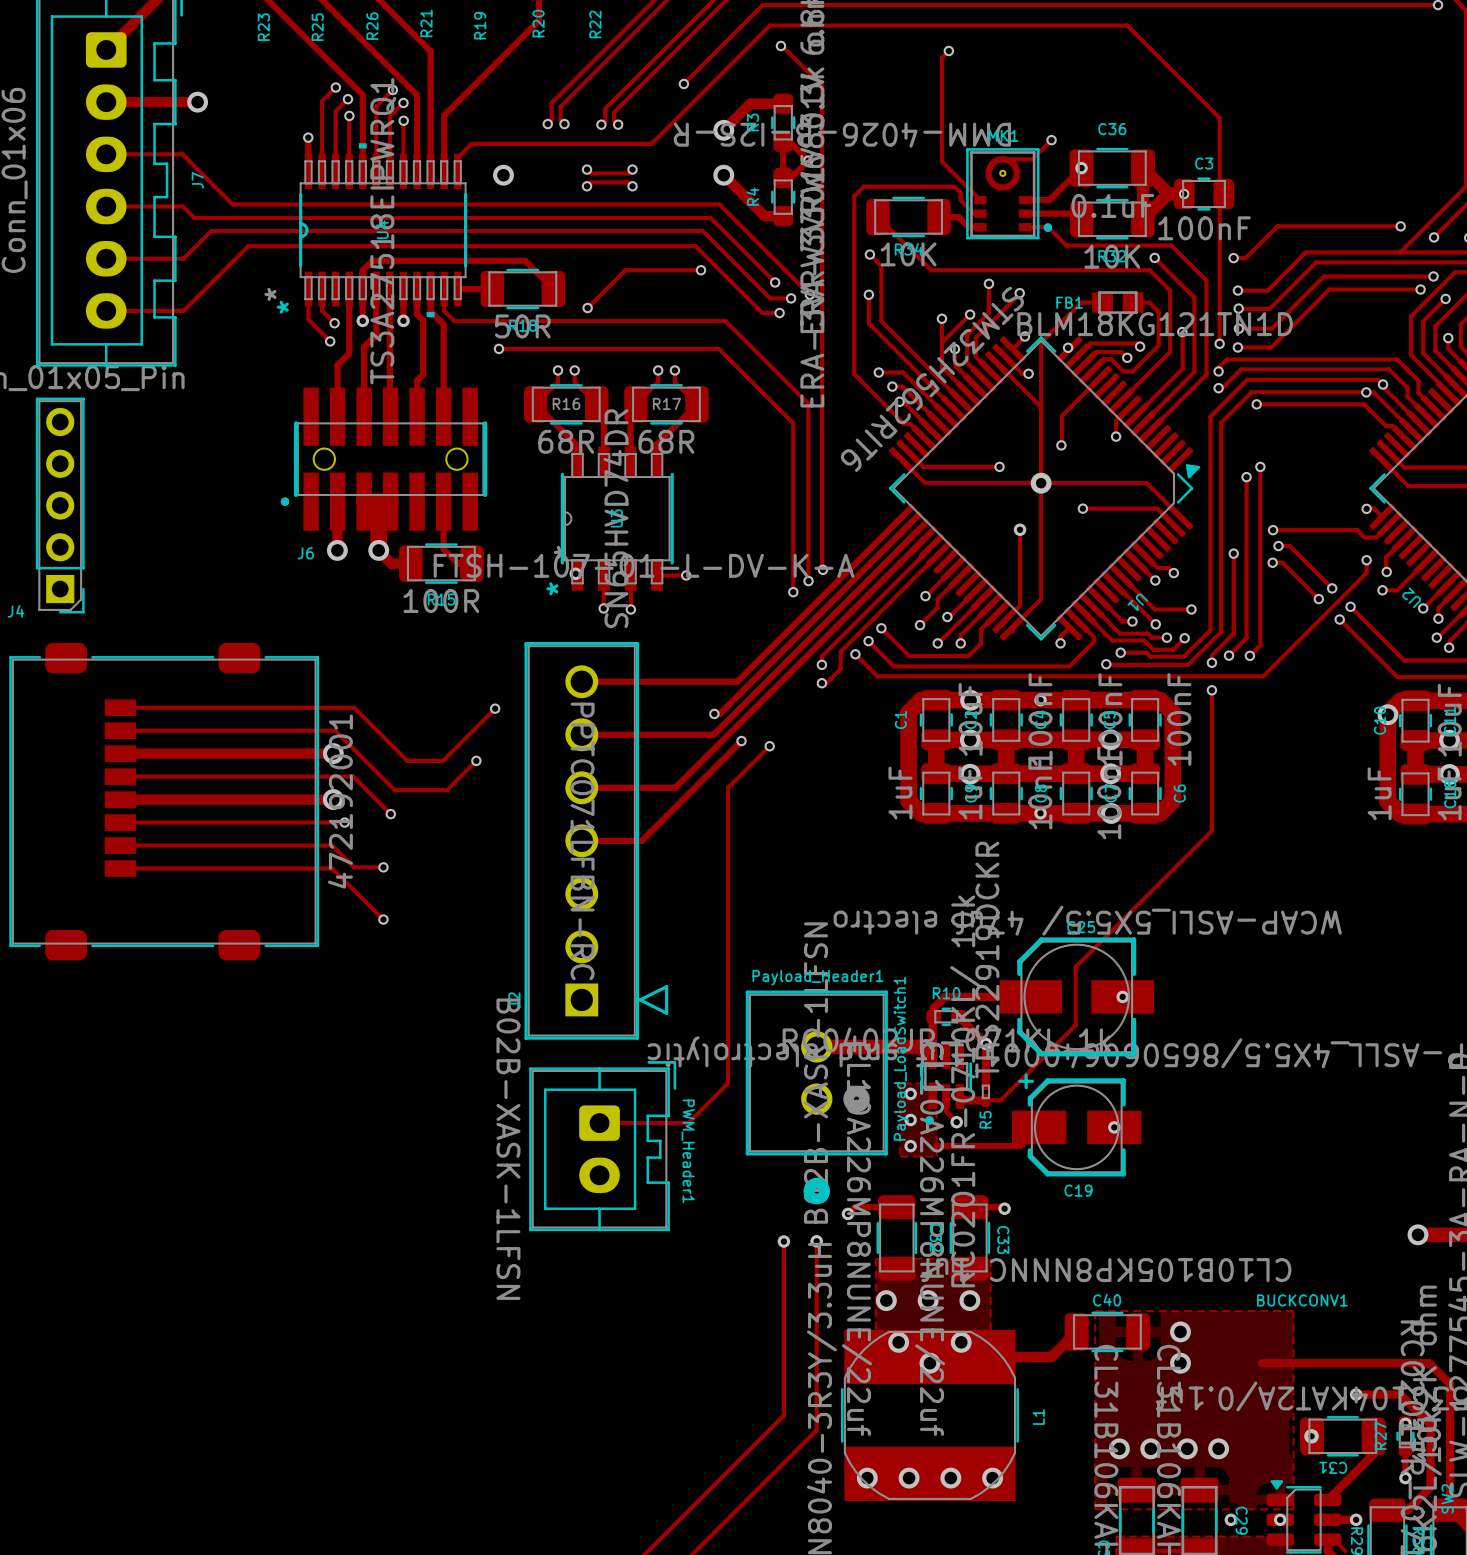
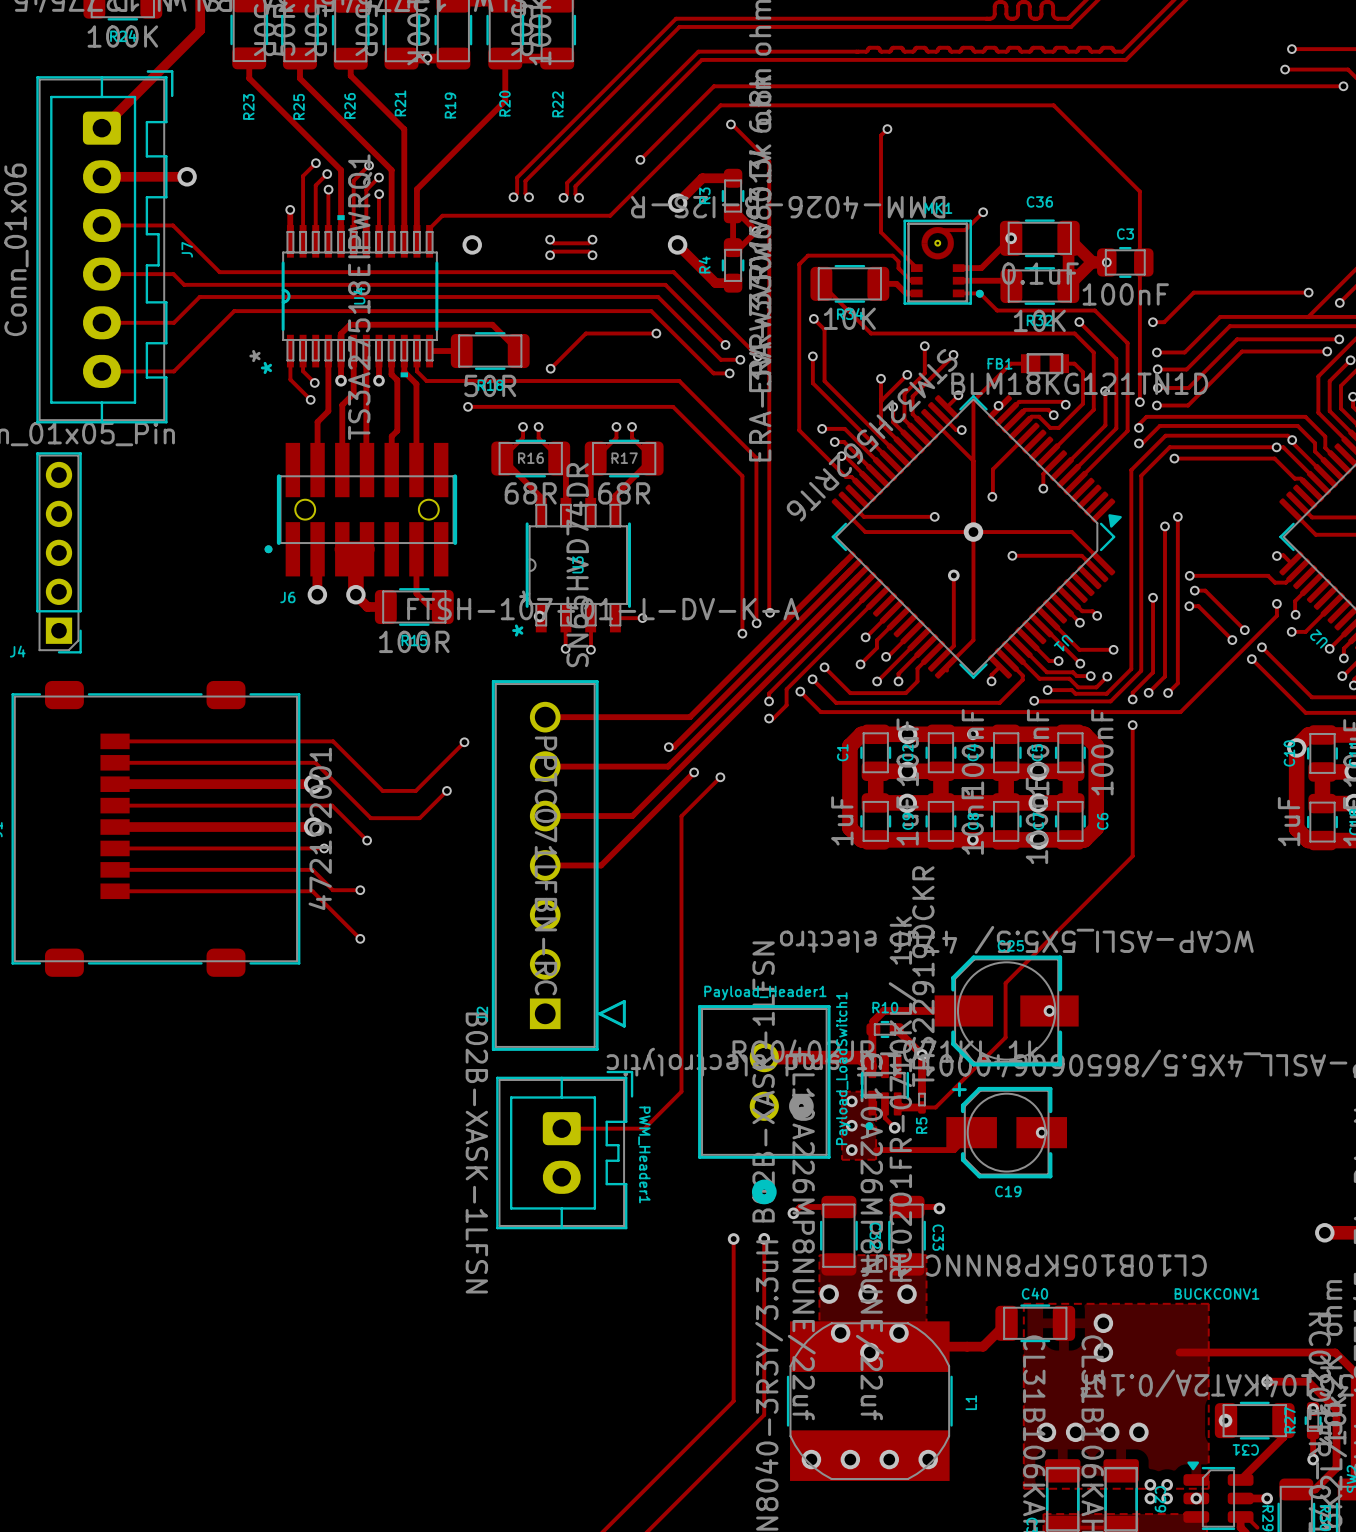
via: none -> (1150, 1484)
via: none -> (1167, 1484)
via: none -> (1167, 1498)

